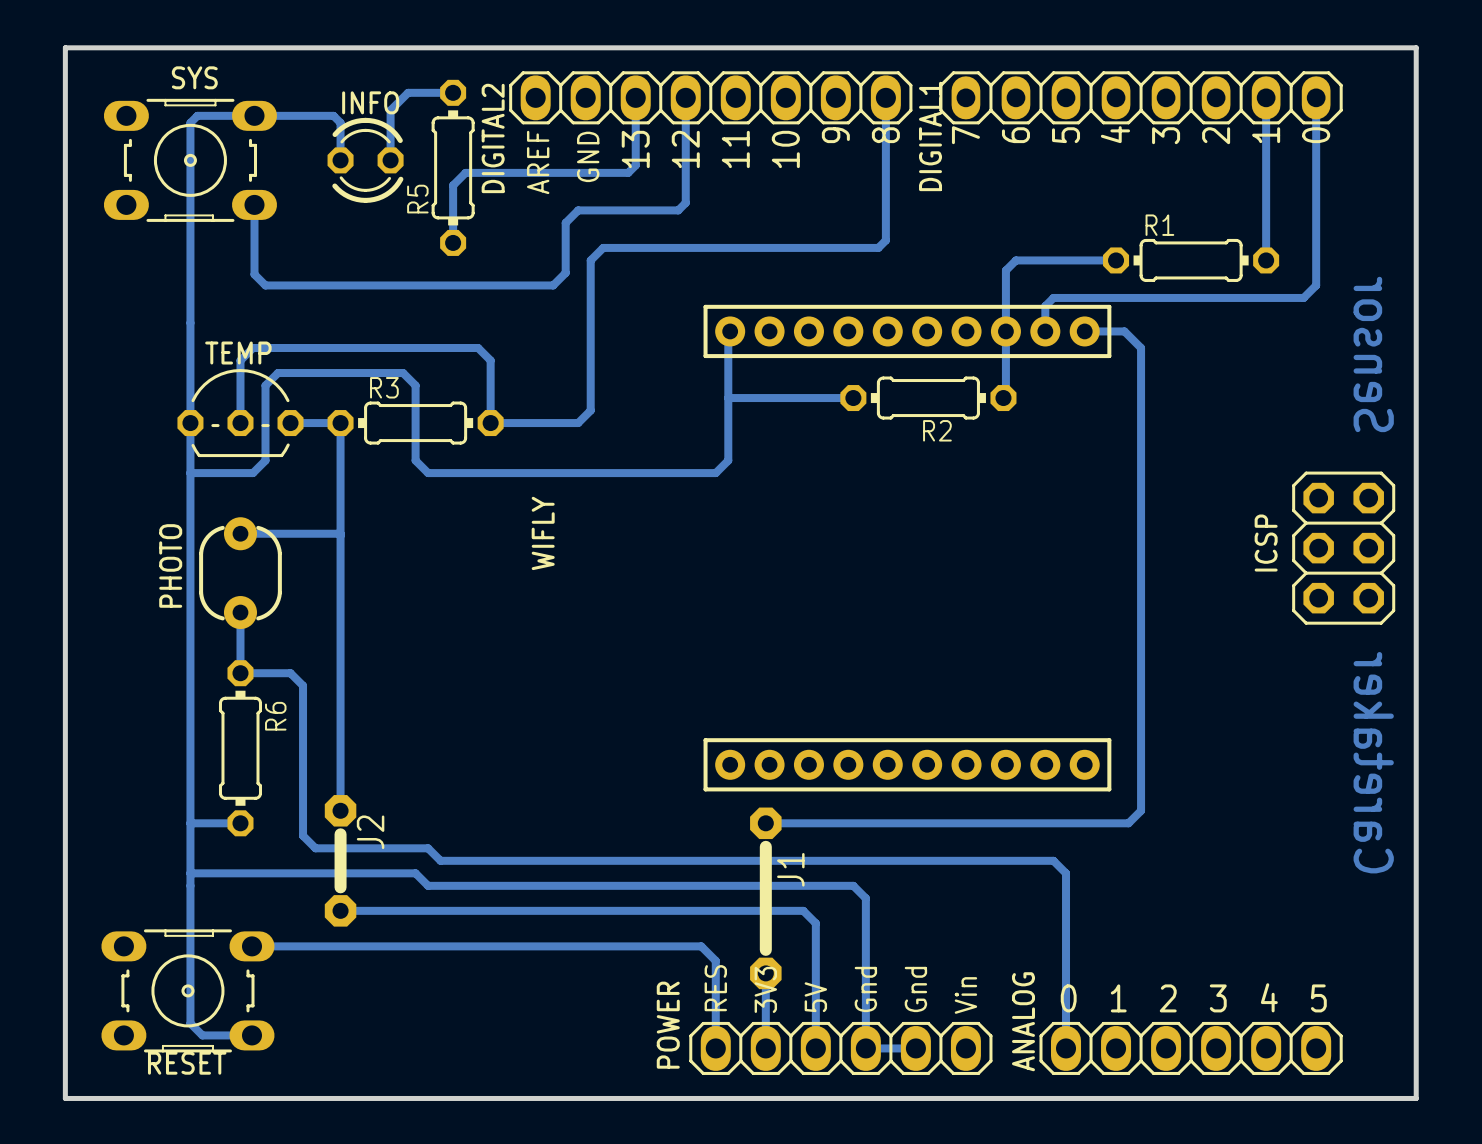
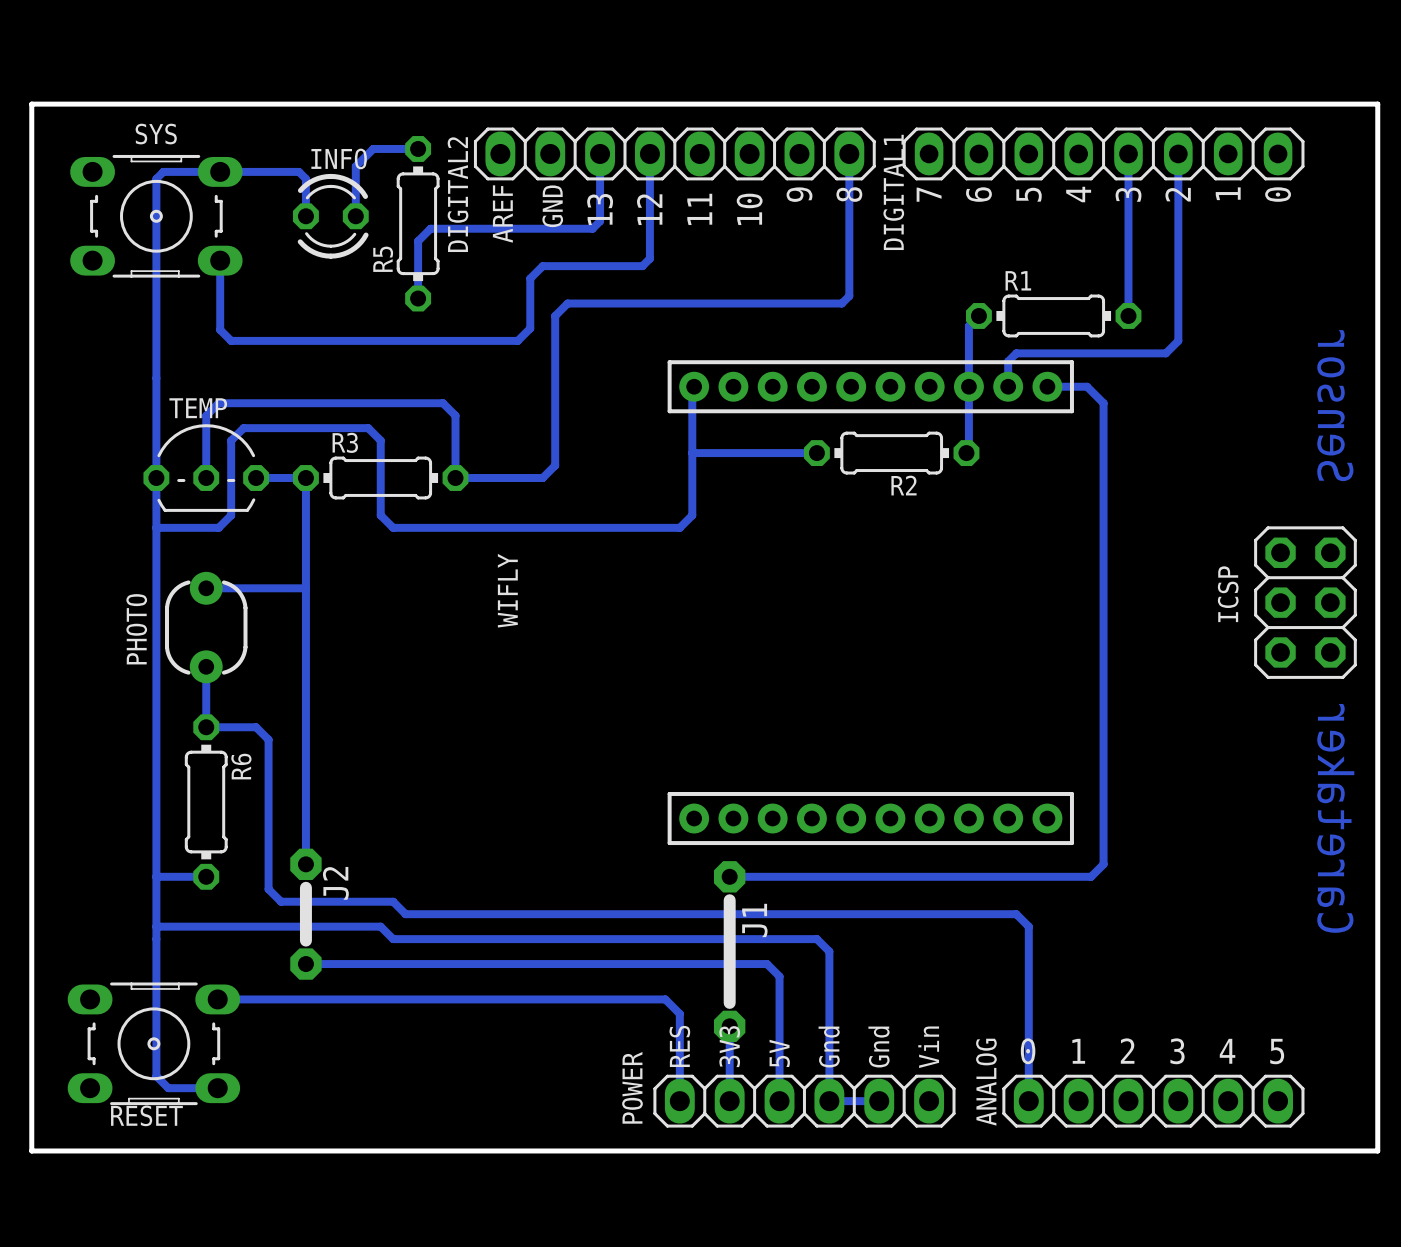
bottom track: (1266, 97) (1266, 260) -> (1128, 153) (1128, 315)
bottom track: (1316, 97) (1316, 285) (1303, 297) (1203, 297) -> (1178, 153) (1178, 340) (1165, 353)
bottom track: (1015, 260) (1116, 260) -> none
R1 position: (1191, 260) -> (1053, 315)

